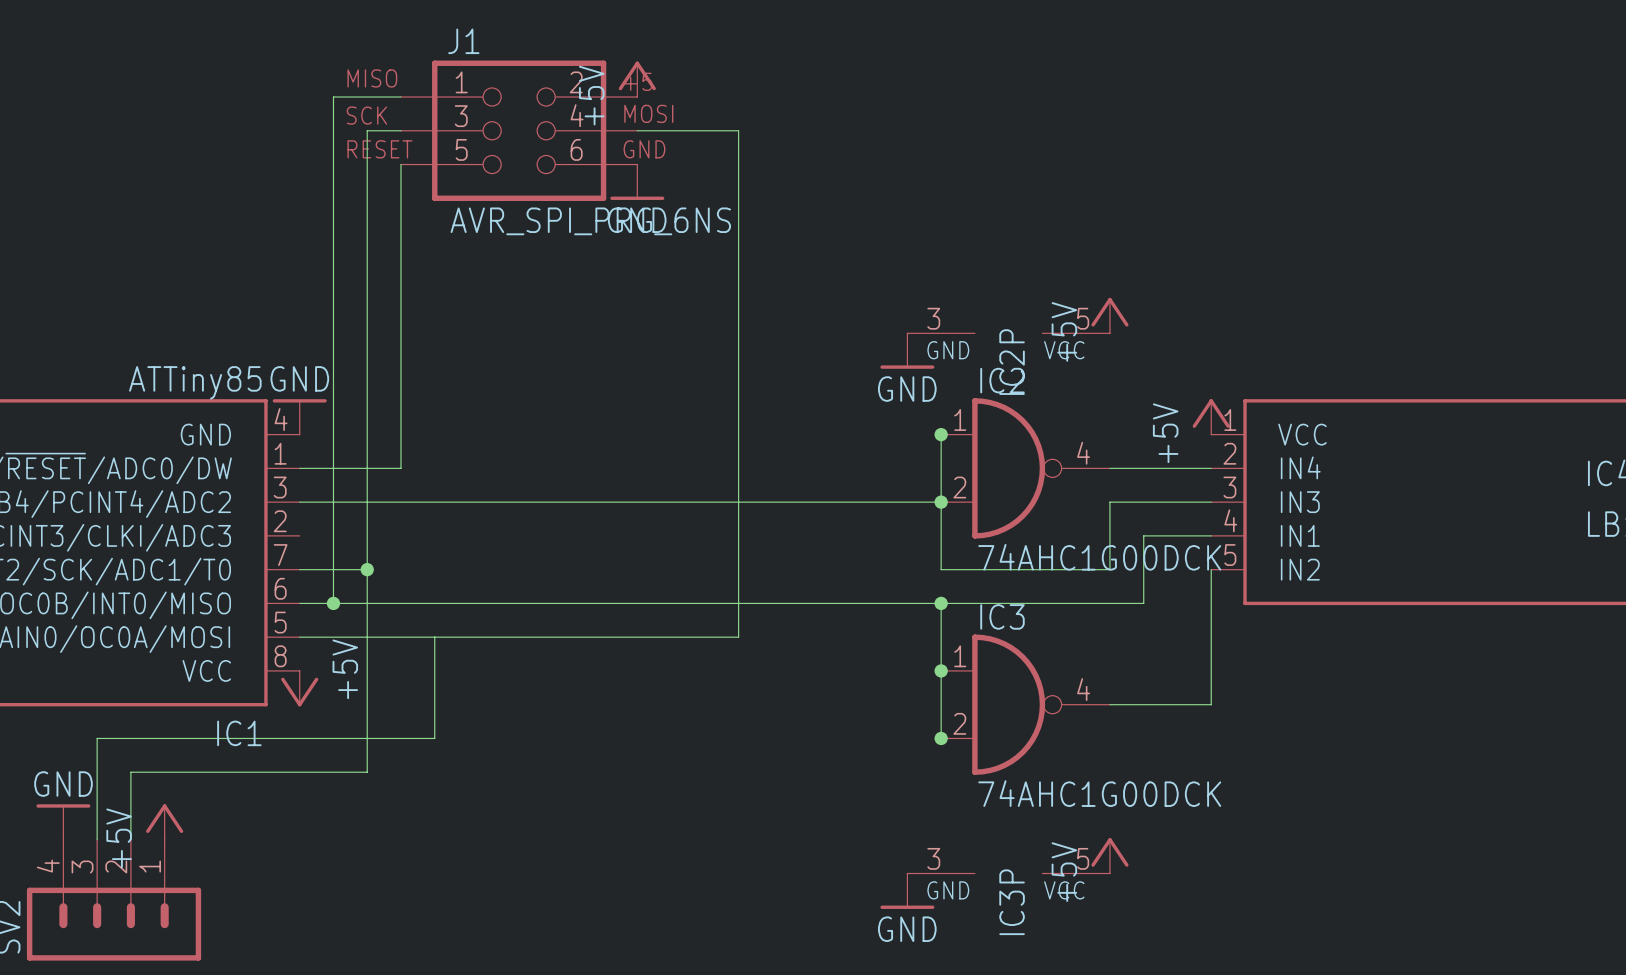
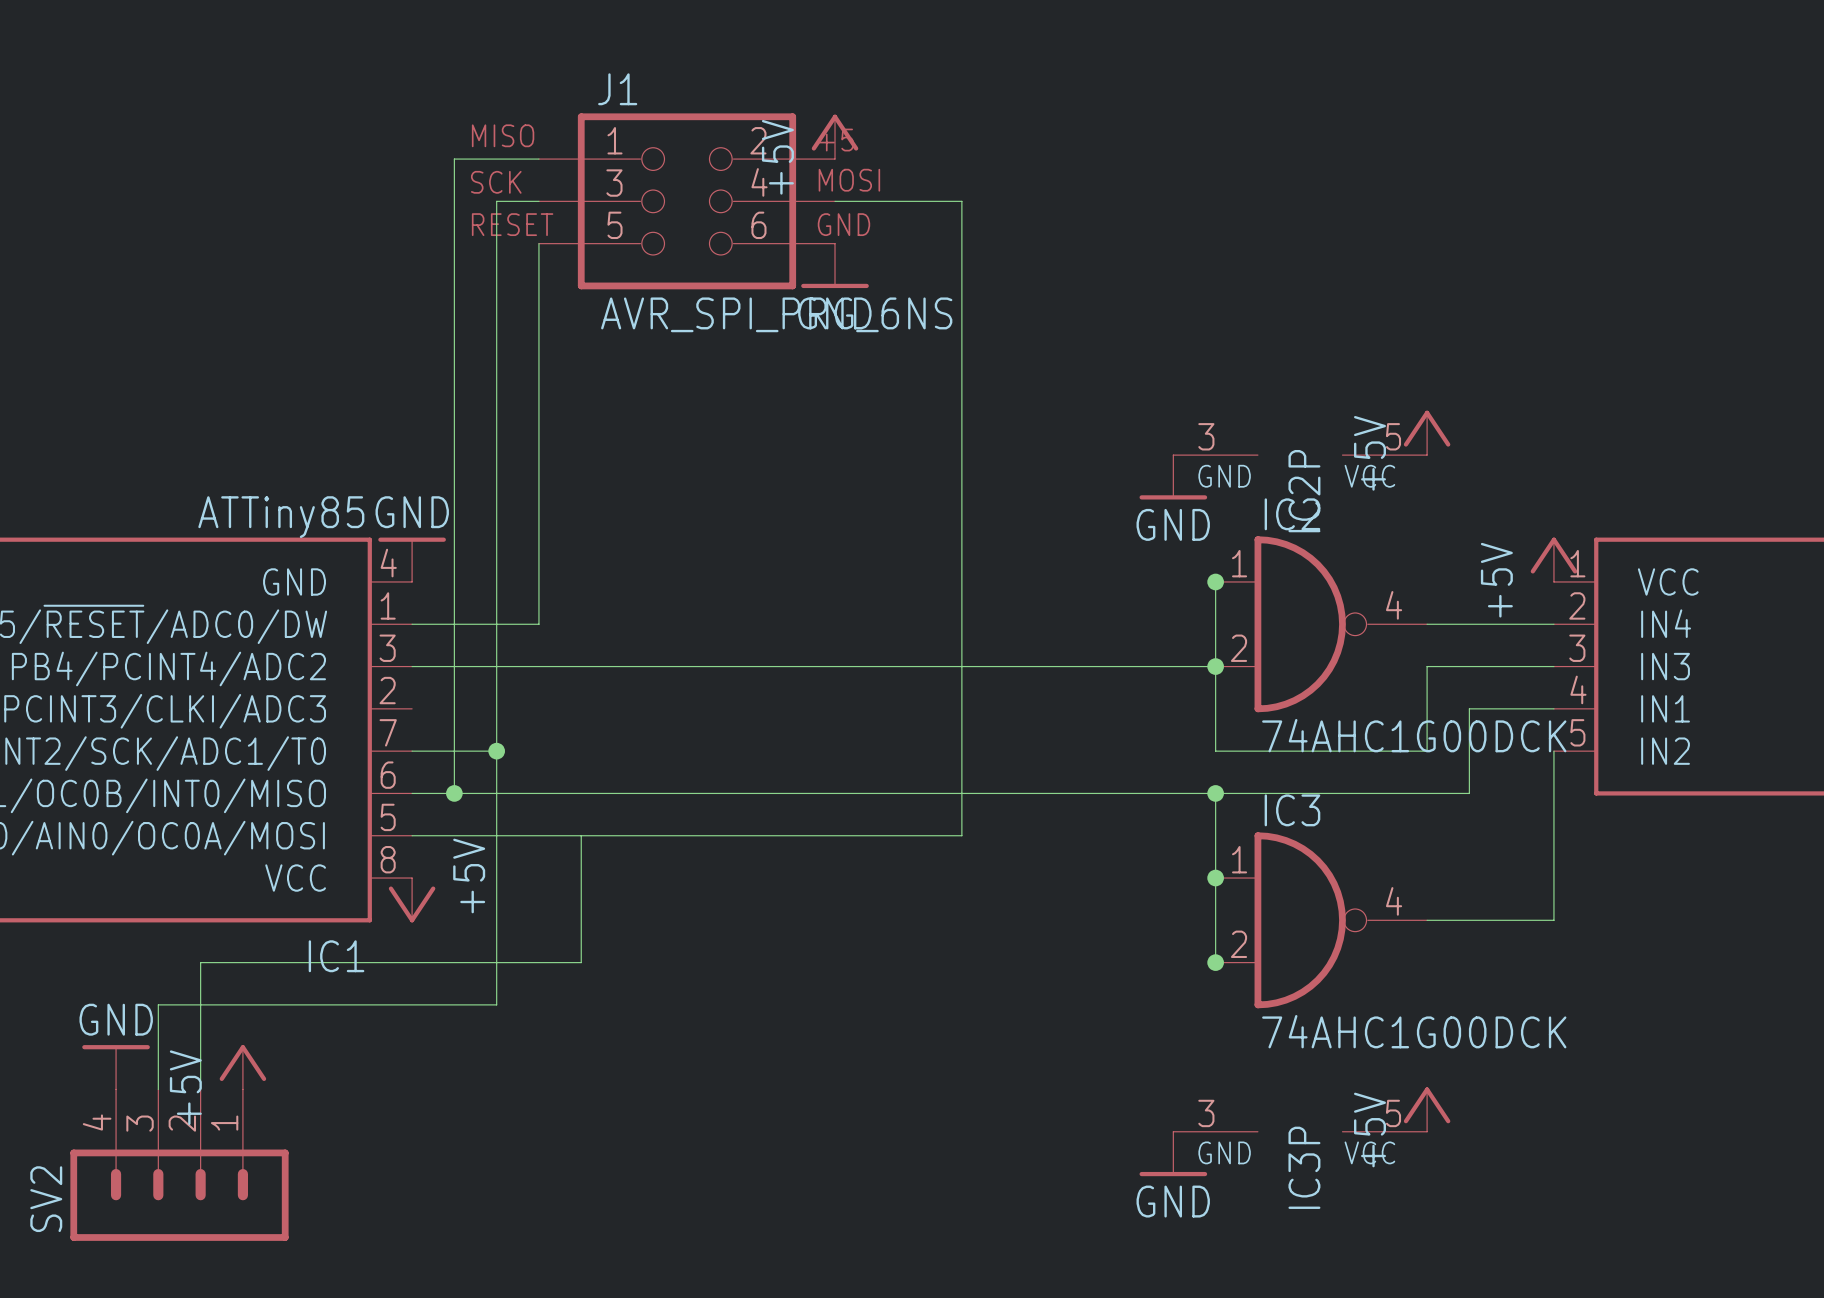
wire: (130, 738) (97, 738) (97, 772) -> (200, 962) (200, 1004) (158, 1004)

